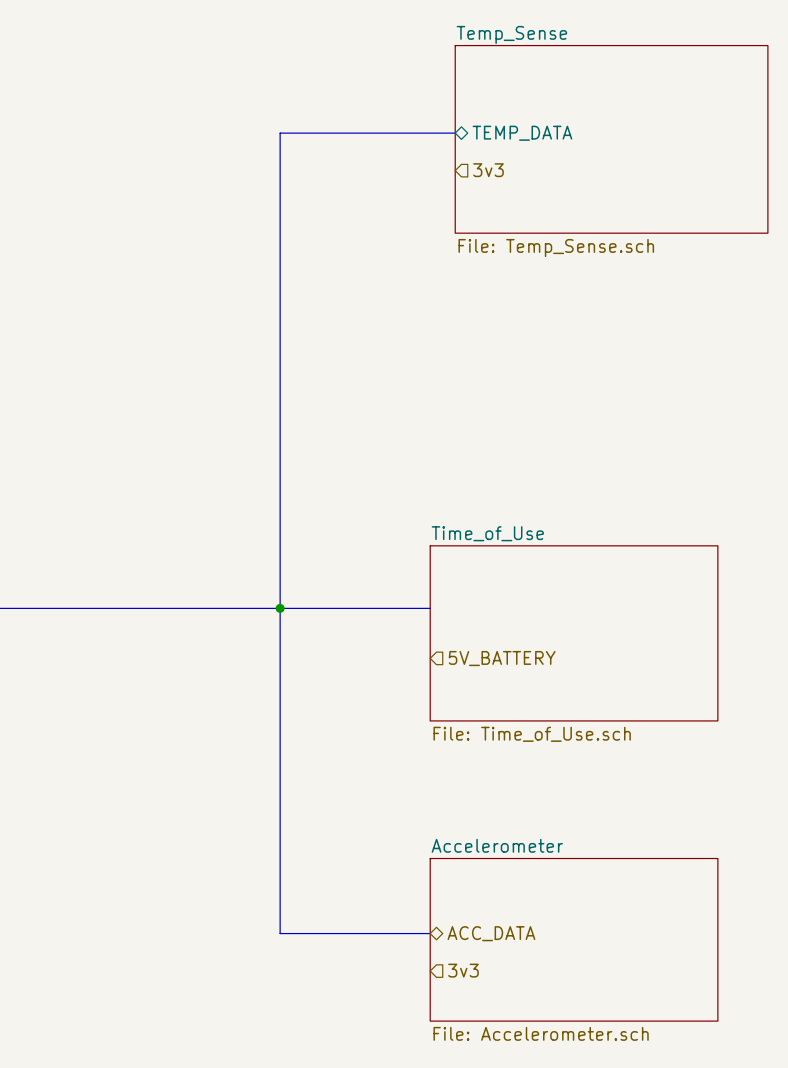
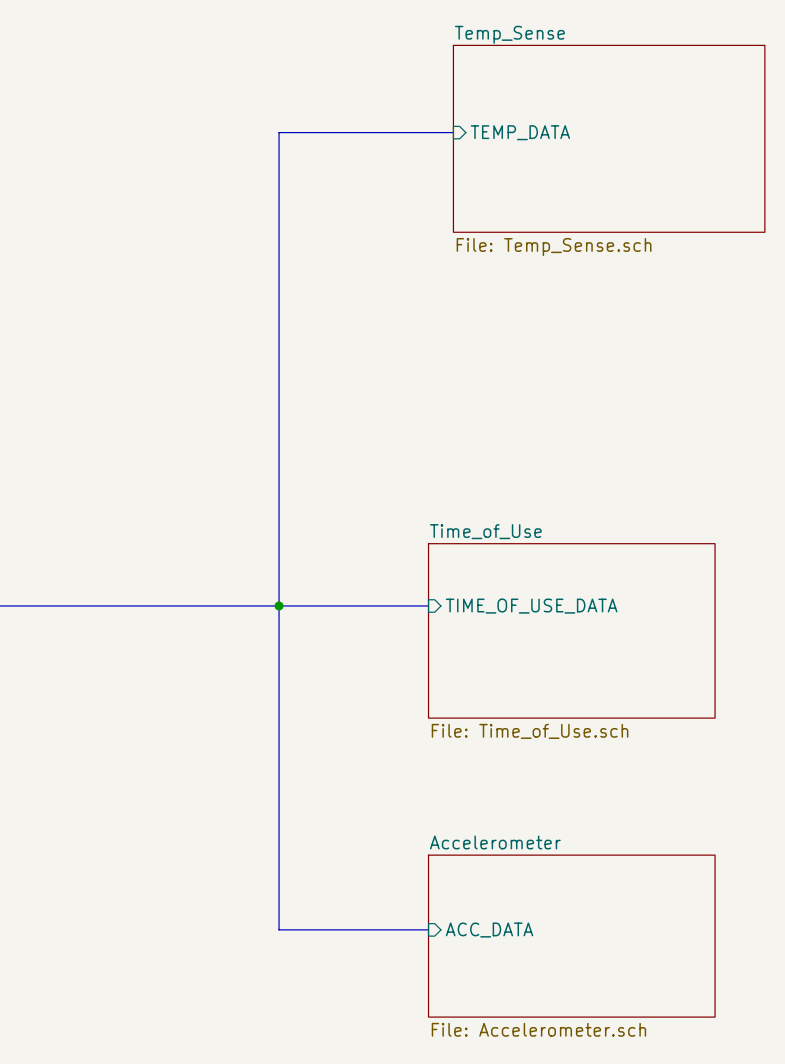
sheet pin shape: bidirectional (522, 133) -> input (520, 132)
hierarchical label: 3v3 (488, 170) -> none
sheet pin: none -> TIME_OF_USE_DATA (531, 606)
hierarchical label: 5V_BATTERY (502, 658) -> none
sheet pin: none -> ACC_DATA (489, 930)
hierarchical label: ACC_DATA (491, 933) -> none
hierarchical label: 3v3 (463, 970) -> none

